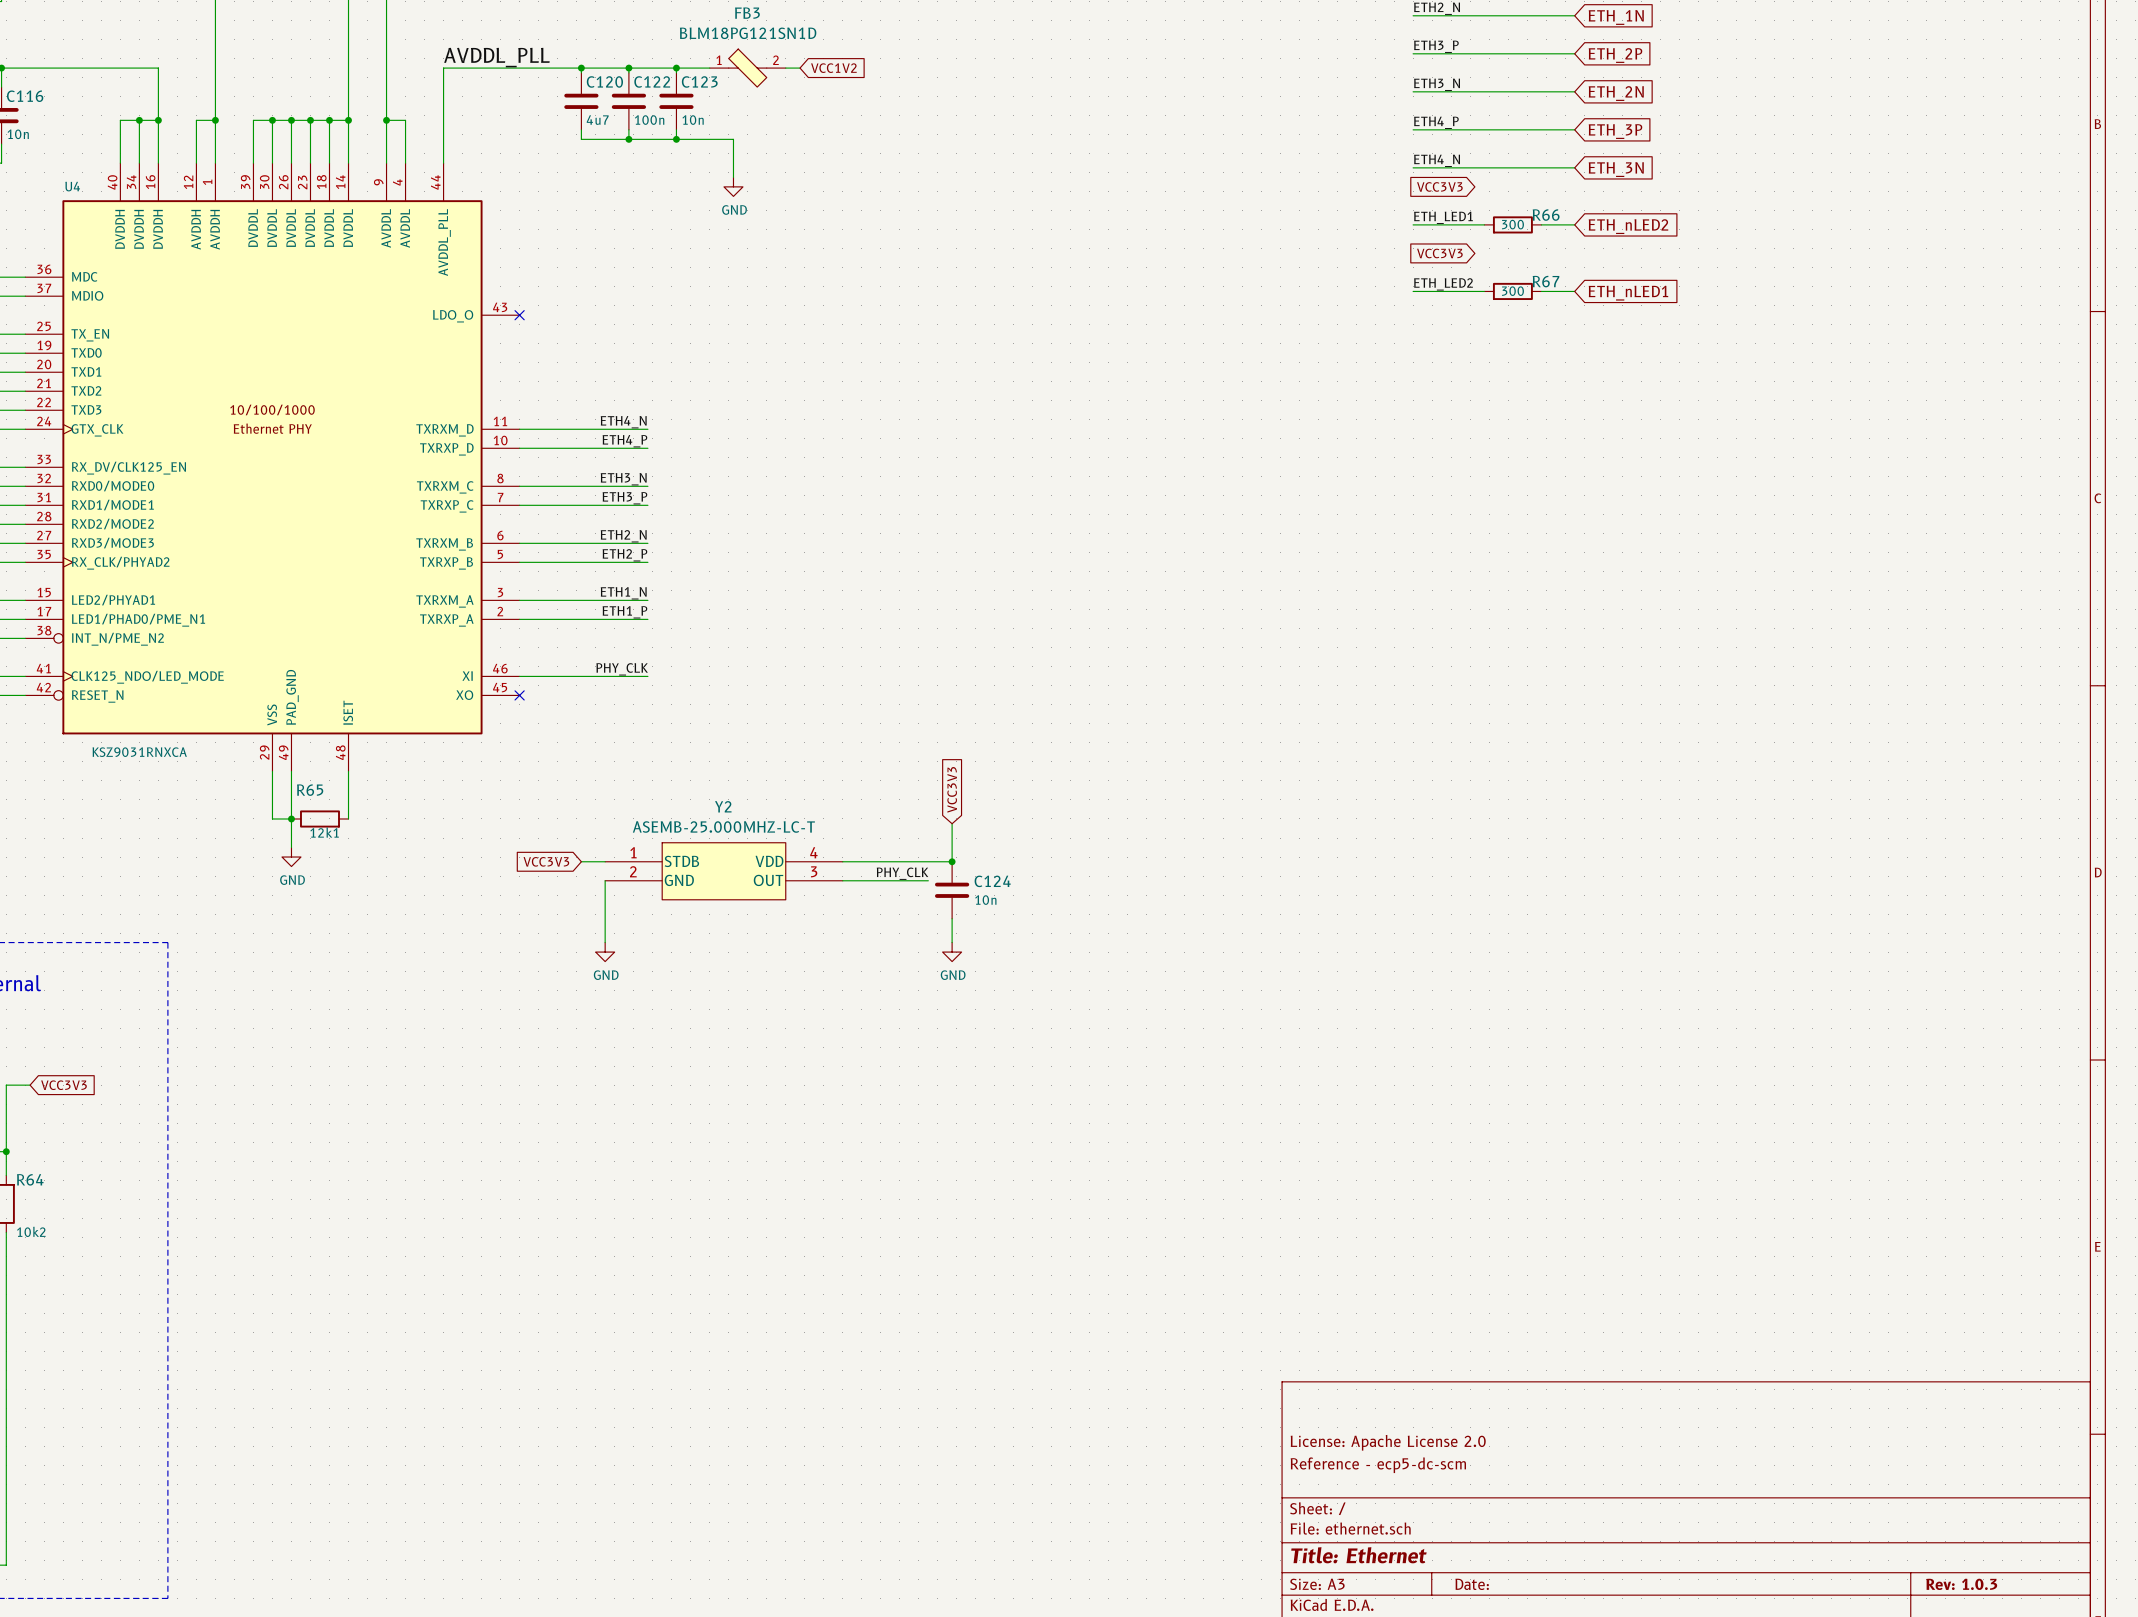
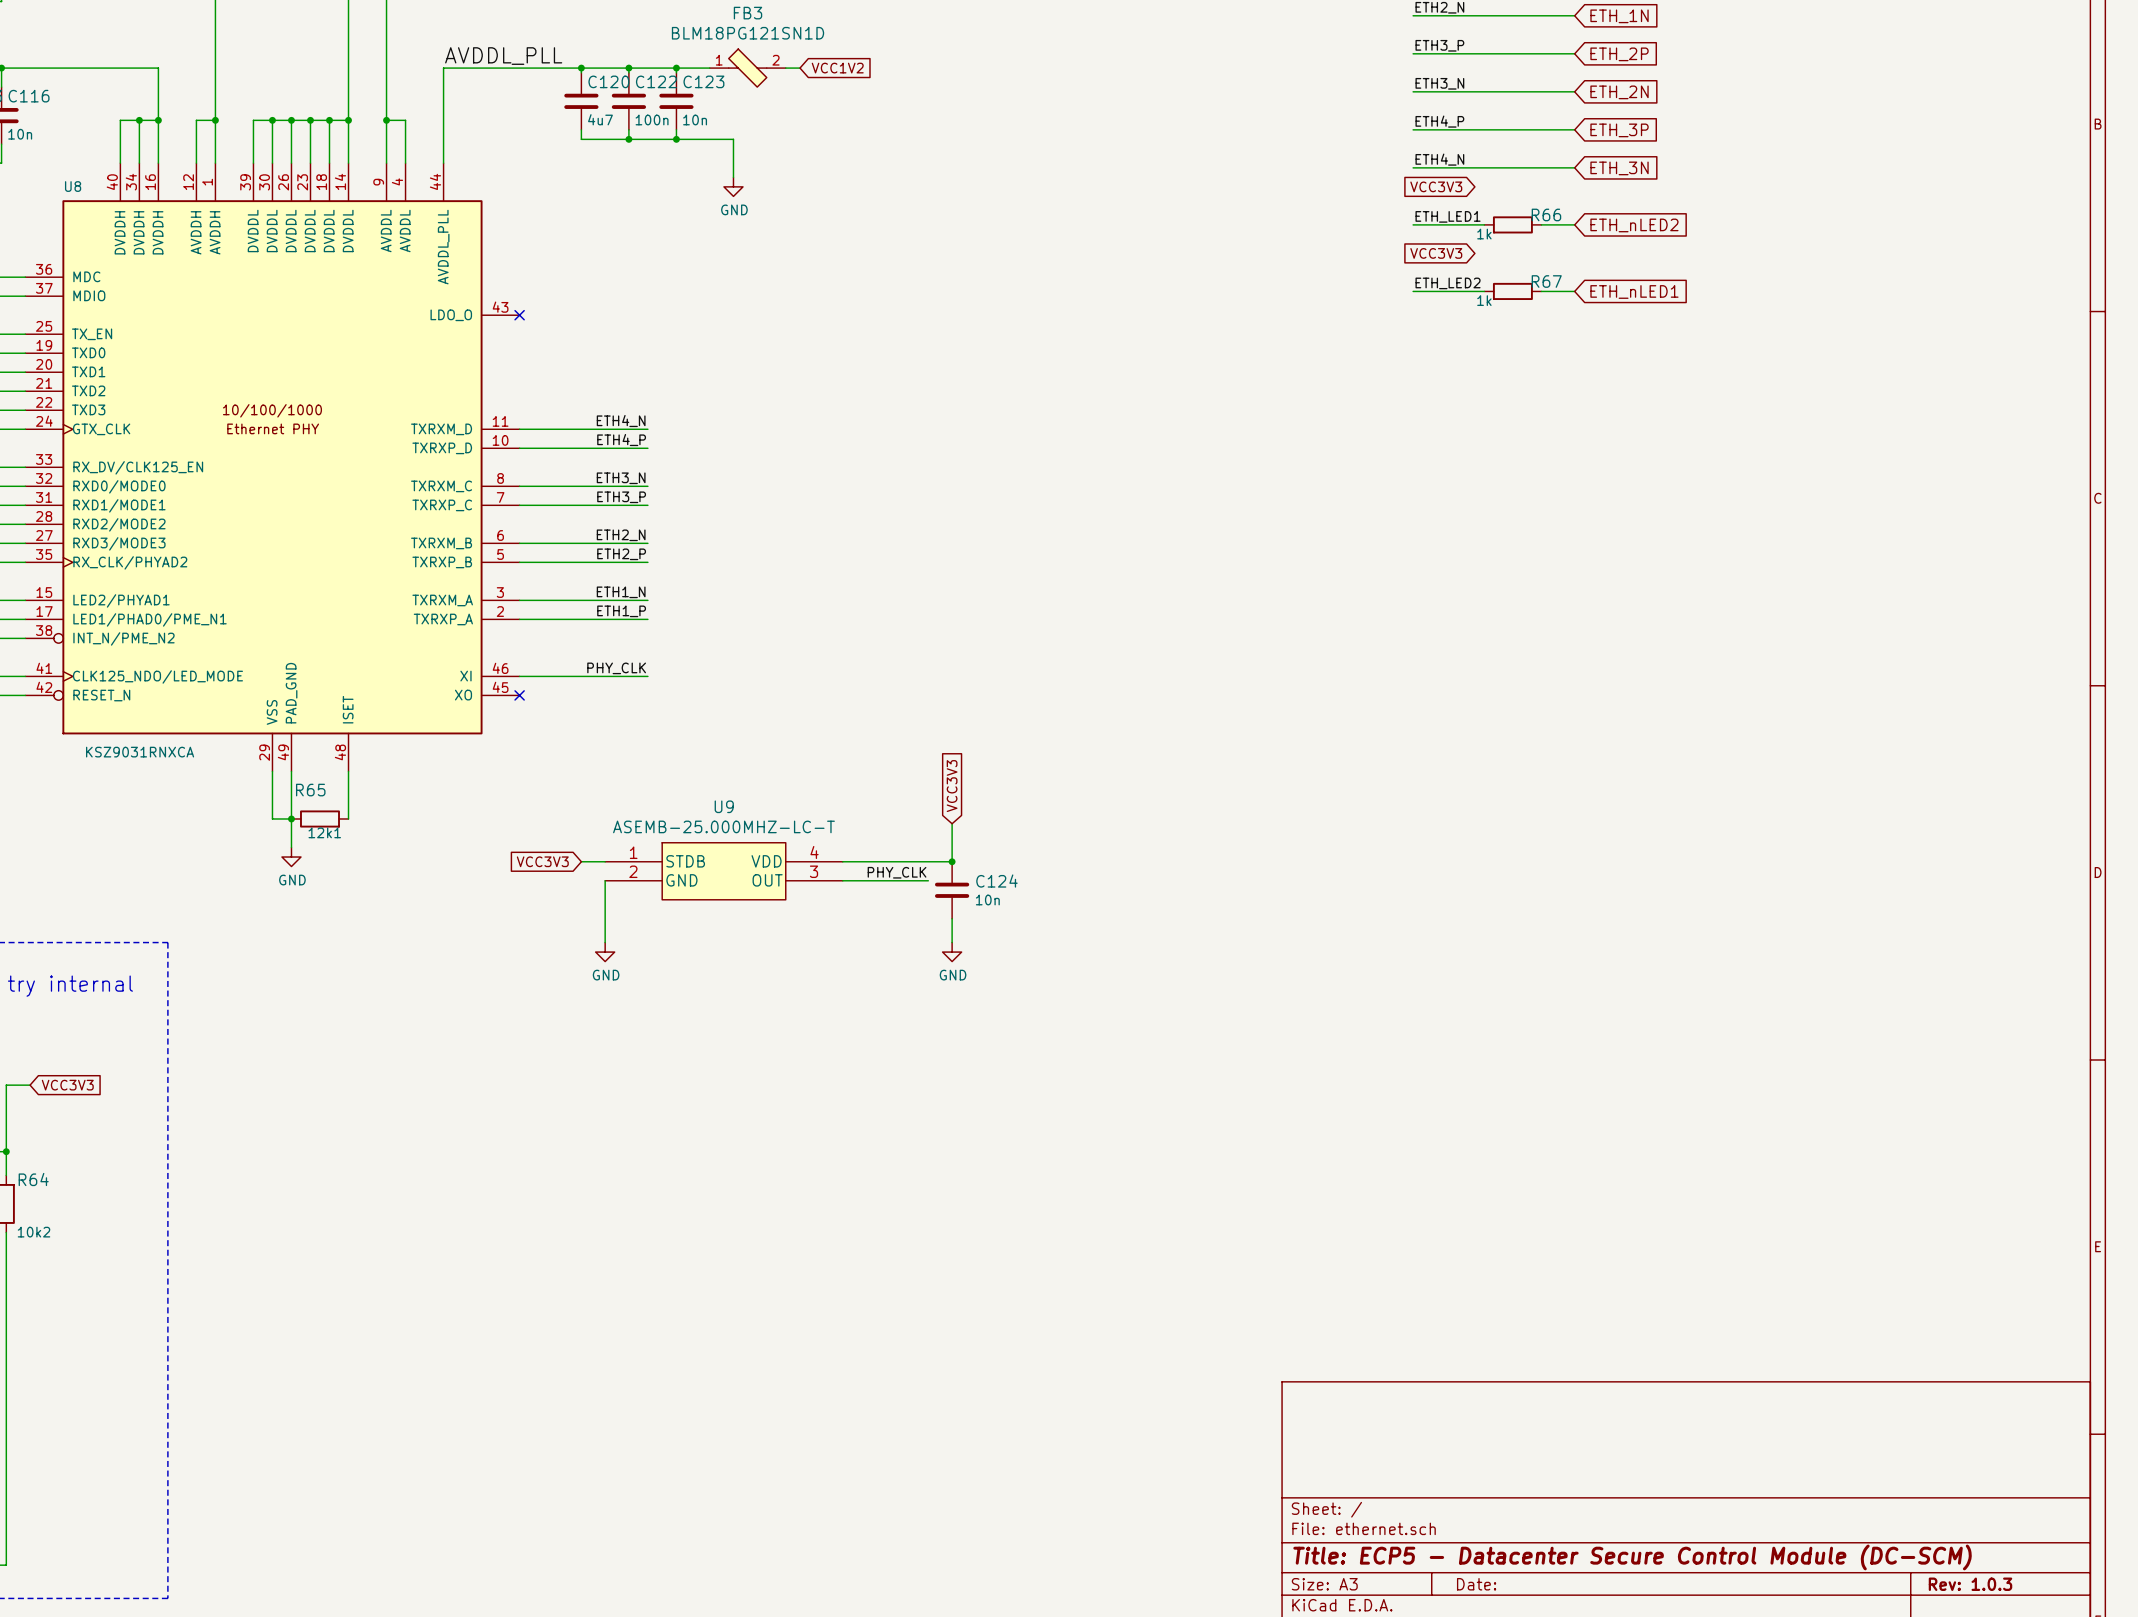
U4 name: U4 (72, 186) -> U8 (73, 186)
R66 text: 300 (1512, 224) -> 1k (1484, 234)
R67 text: 300 (1512, 291) -> 1k (1484, 300)
Y2 name: Y2 (723, 806) -> U9 (724, 806)
title block: License: Apache License 2.0 (1388, 1442) -> none
title block: Reference - ecp5-dc-scm (1378, 1465) -> none
title block: Title: Ethernet (1358, 1555) -> Title: ECP5 - Datacenter Secure Control Module (DC-SCM) (1632, 1557)

